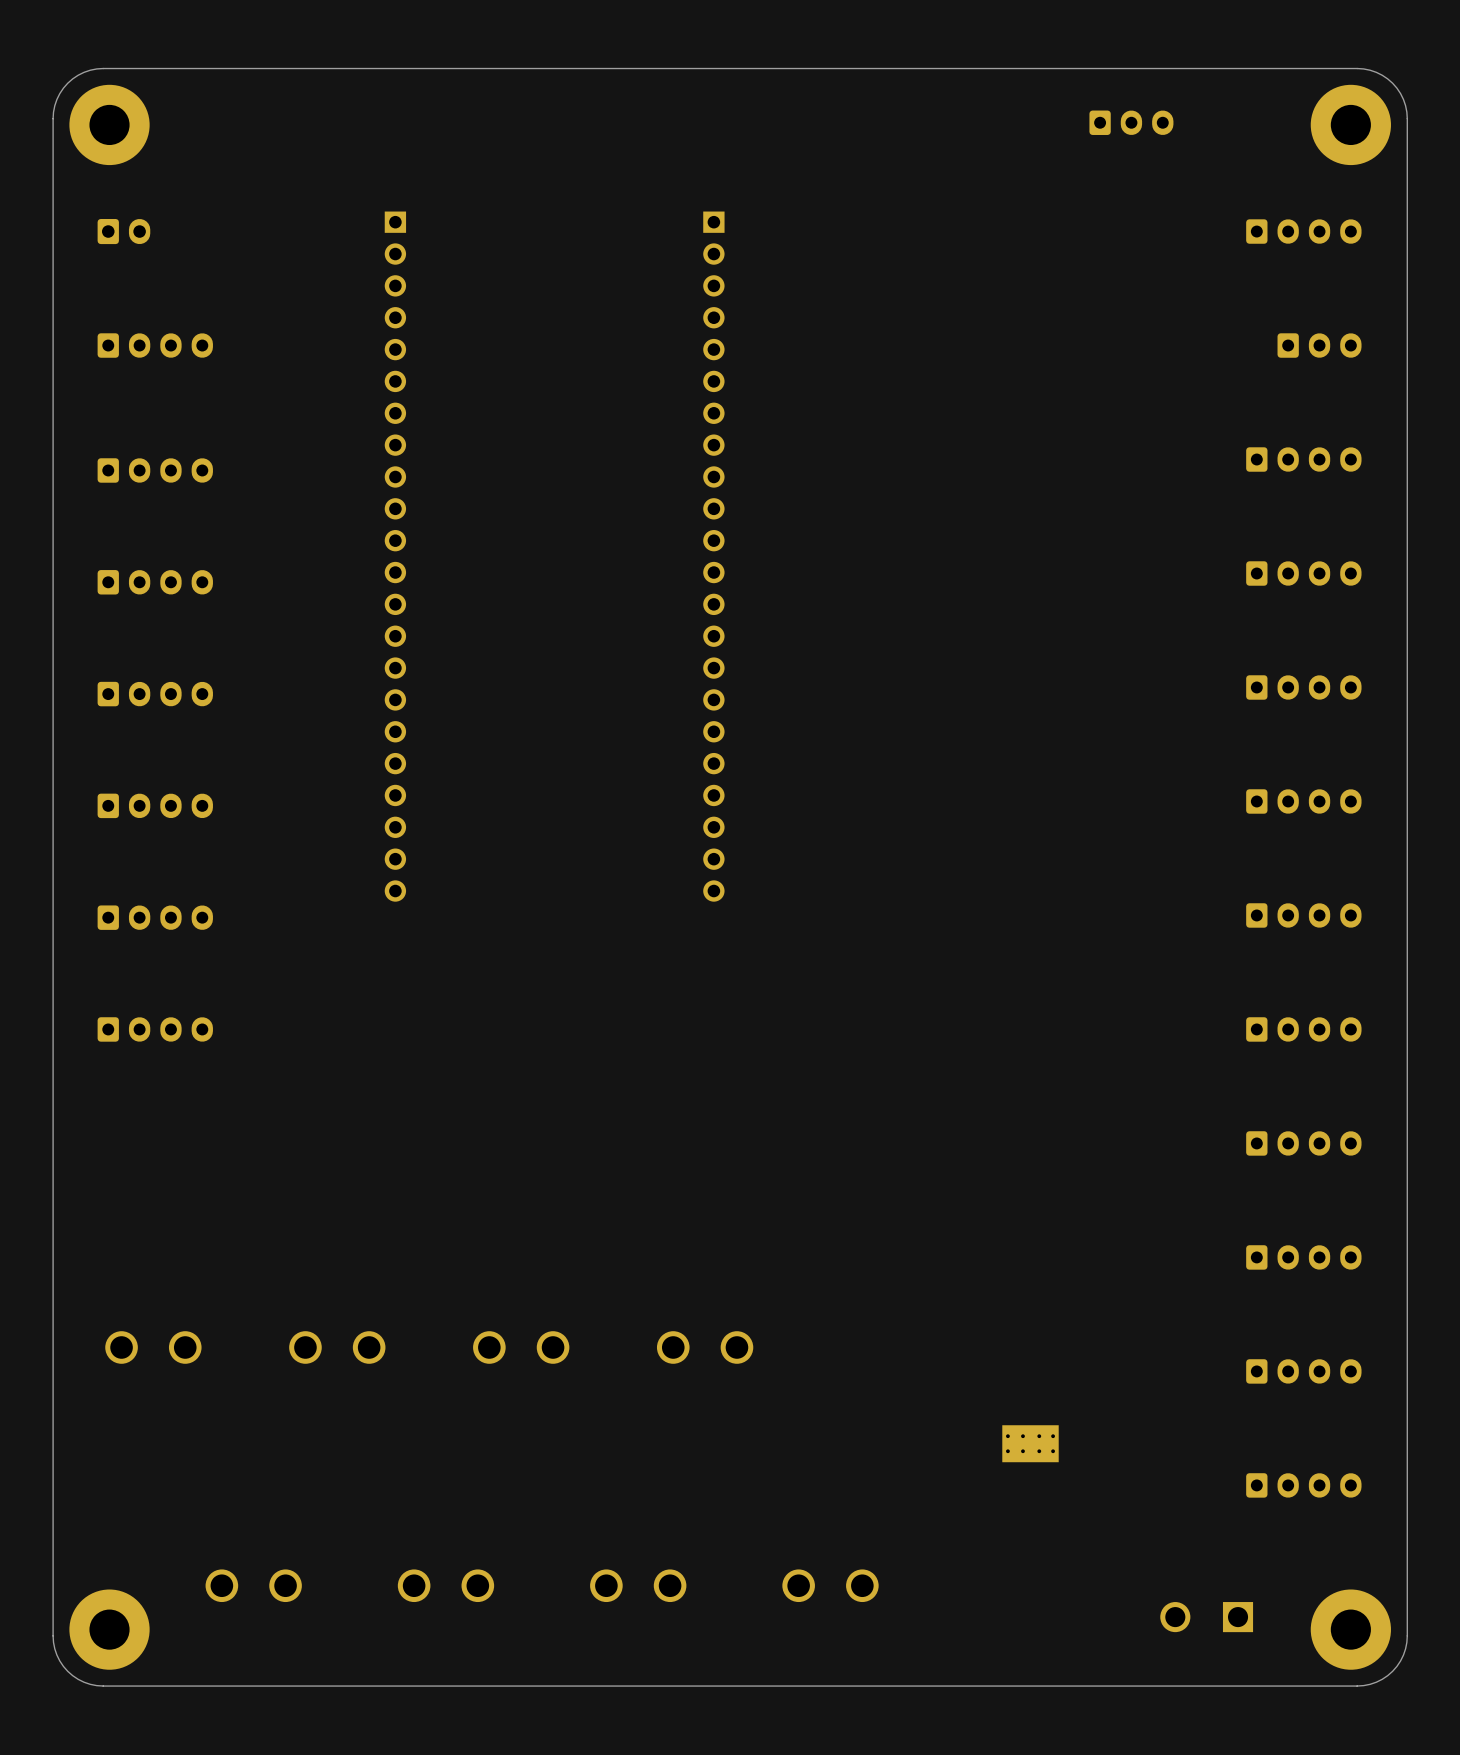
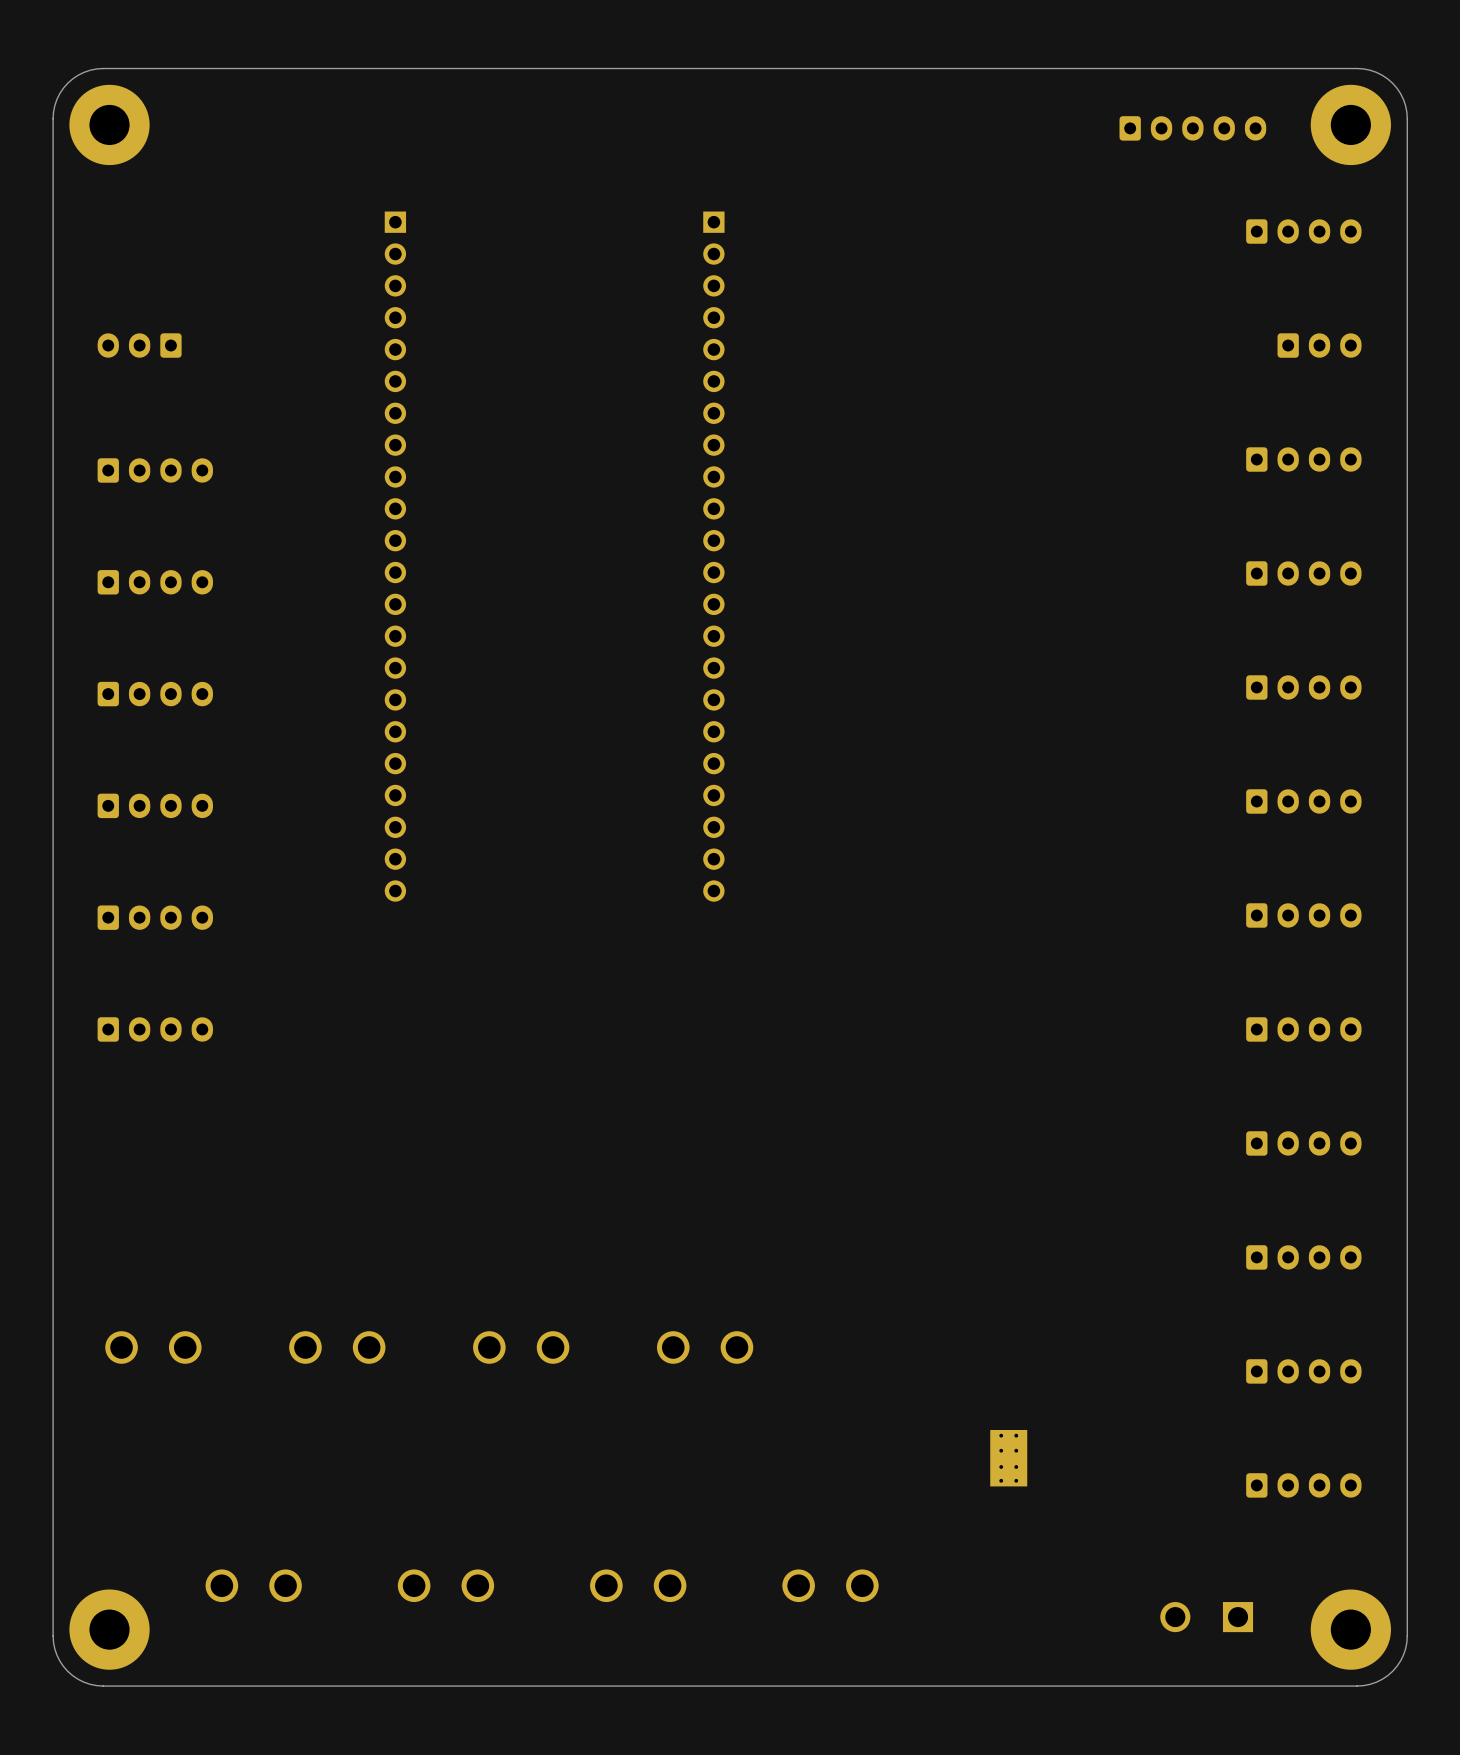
part: (1131, 122) -> none
part: none -> (1192, 128)
part: (123, 231) -> none
part: none -> (139, 345)
part: (155, 345) -> none
part rotation: 0° (1030, 1443) -> 90° clockwise (1008, 1458)

